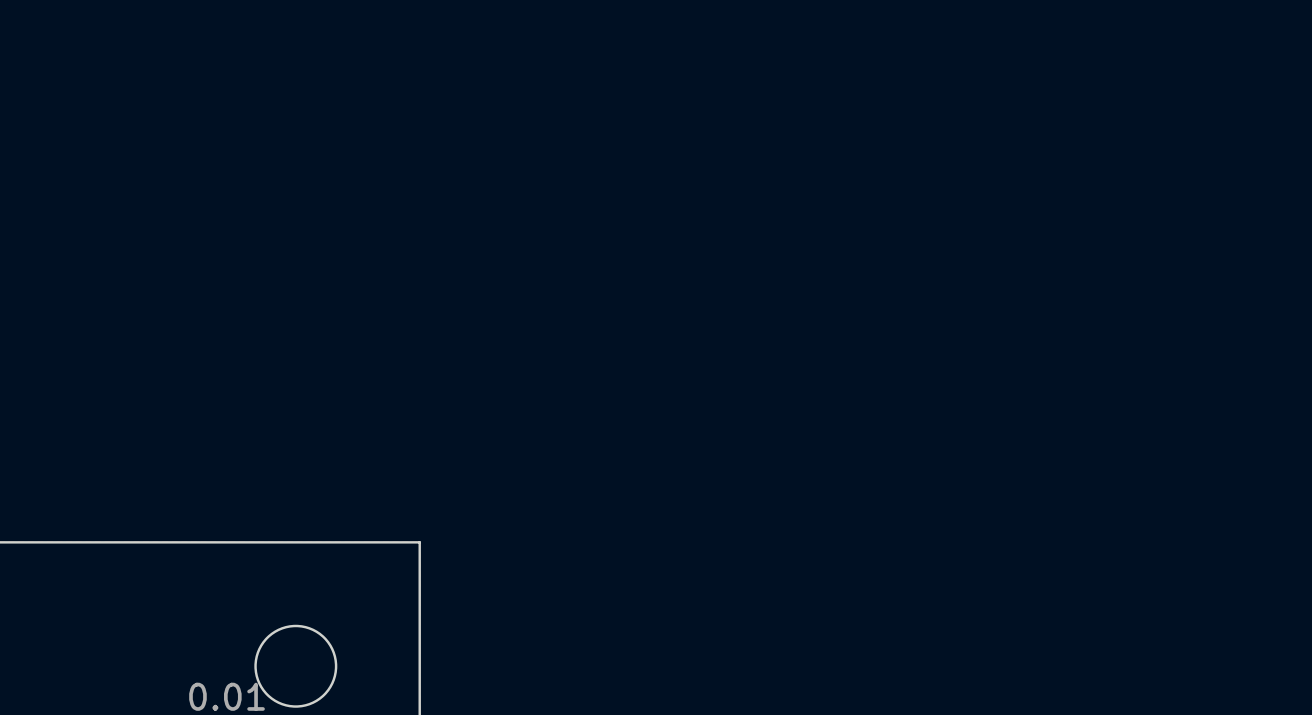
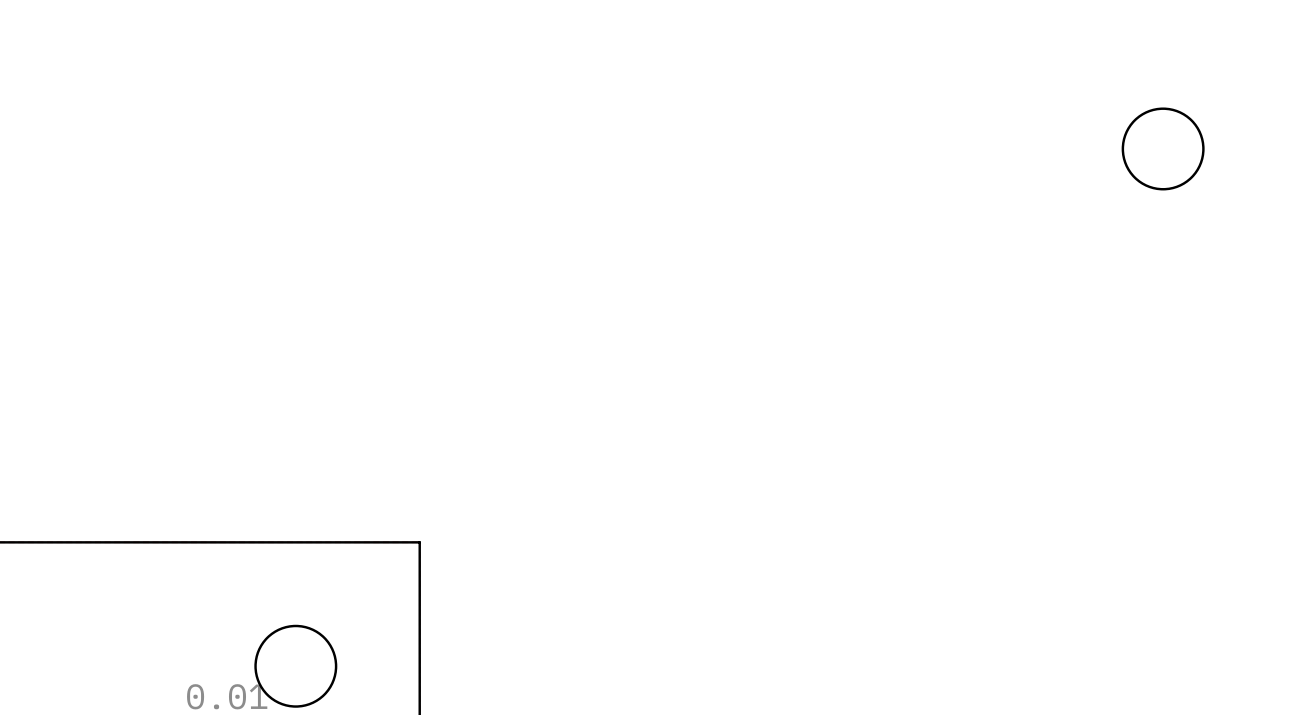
round board edge: none -> [1121, 107, 1205, 191]

